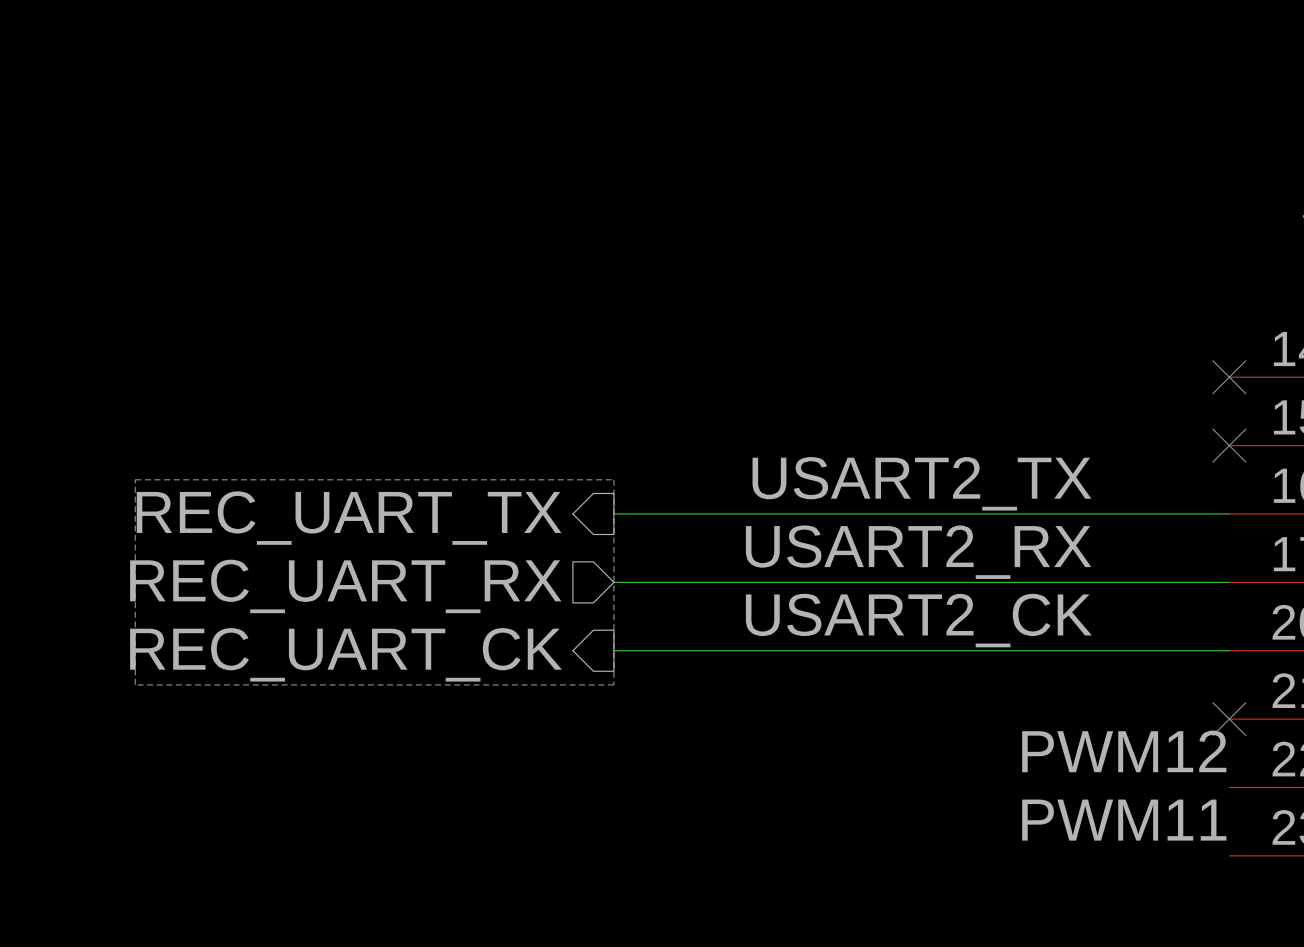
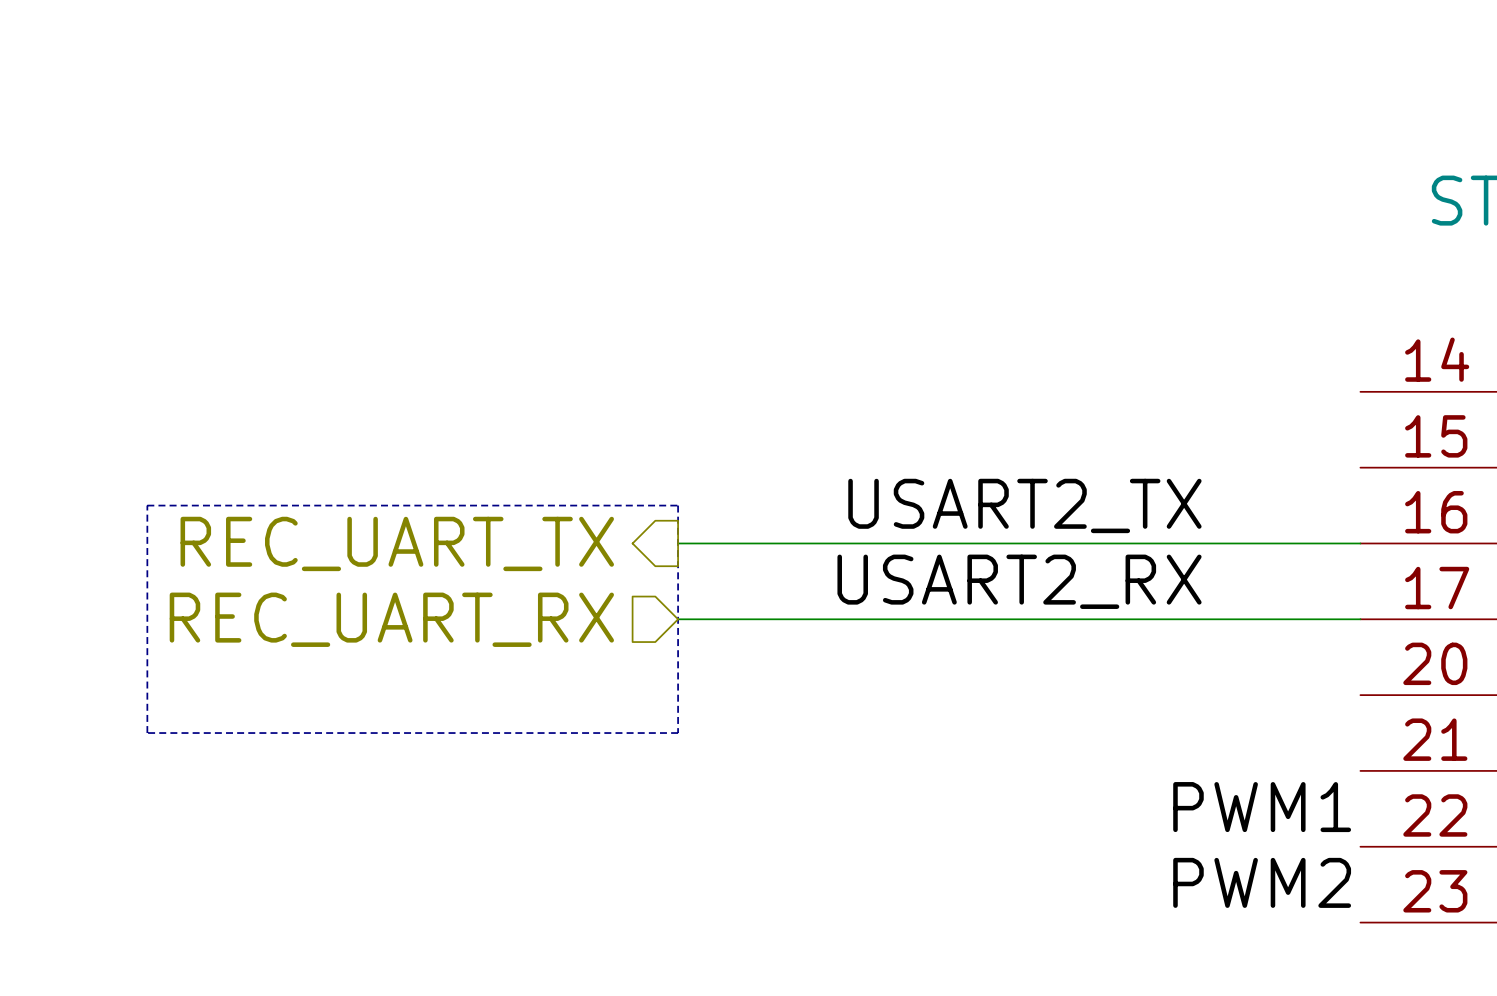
no-connect mark: (1229, 377) -> none
no-connect mark: (1229, 445) -> none
label: USART2_CK (918, 620) -> none
wire: (613, 650) (1229, 650) -> none
hierarchical label: REC_UART_CK (346, 654) -> none
no-connect mark: (1229, 719) -> none
label: PWM12 (1124, 751) -> PWM1 (1262, 807)
label: PWM11 (1124, 820) -> PWM2 (1262, 882)

